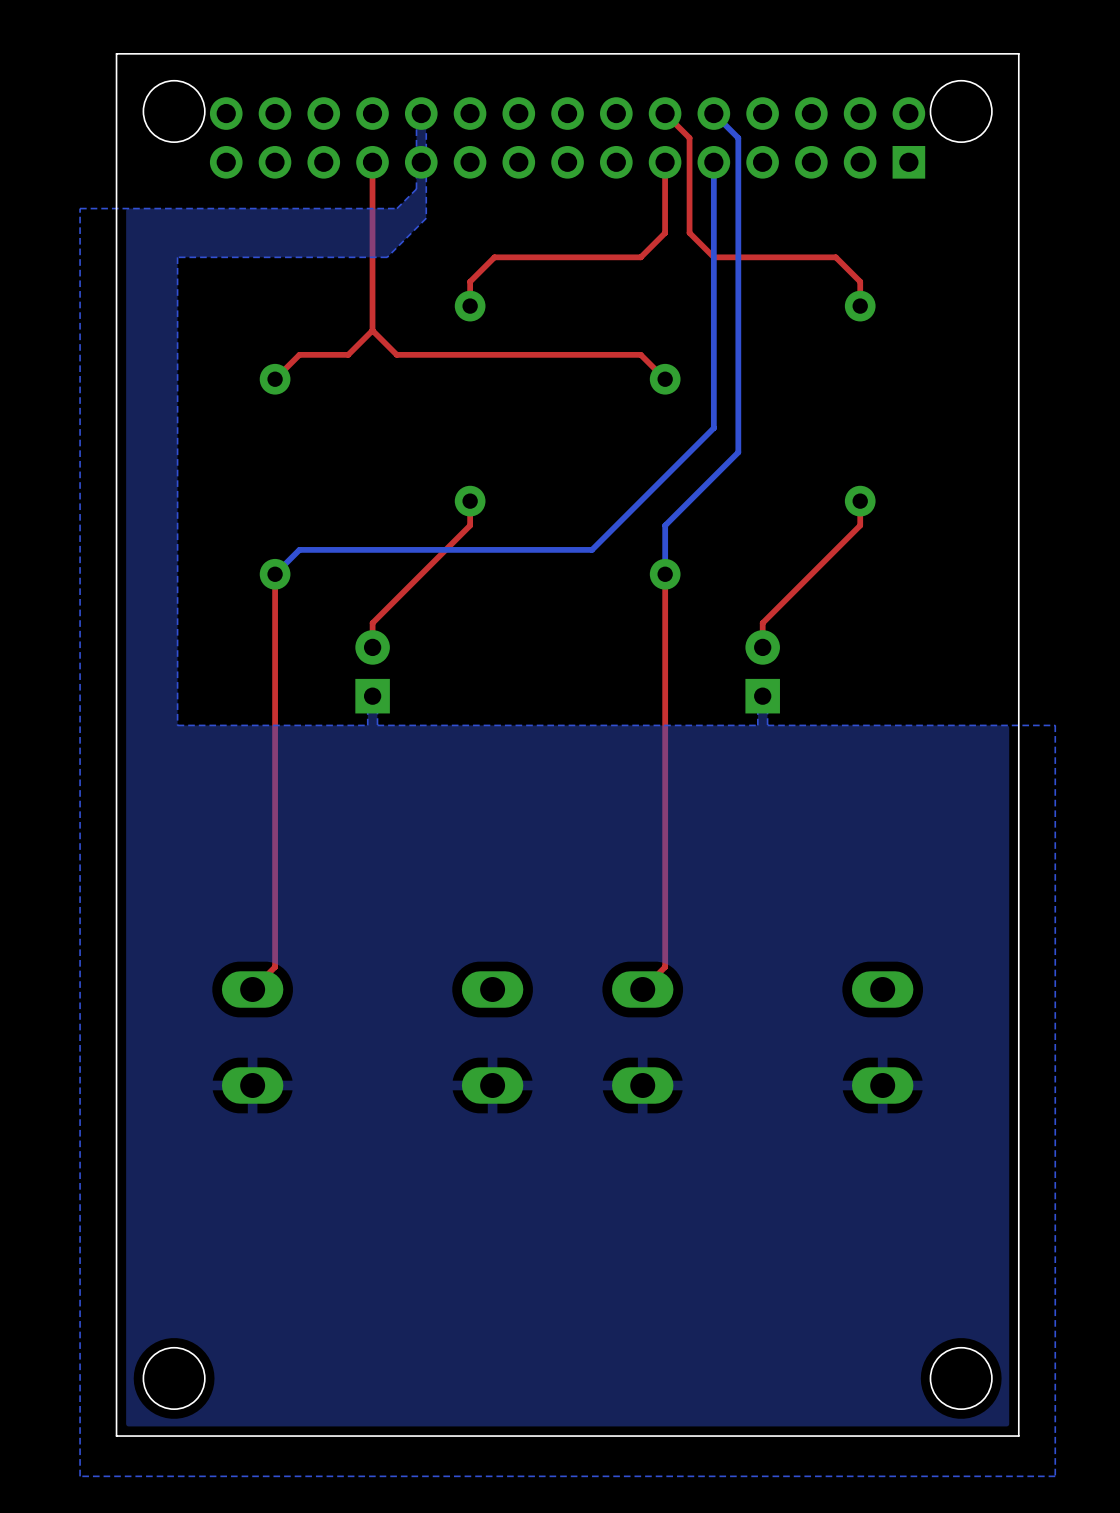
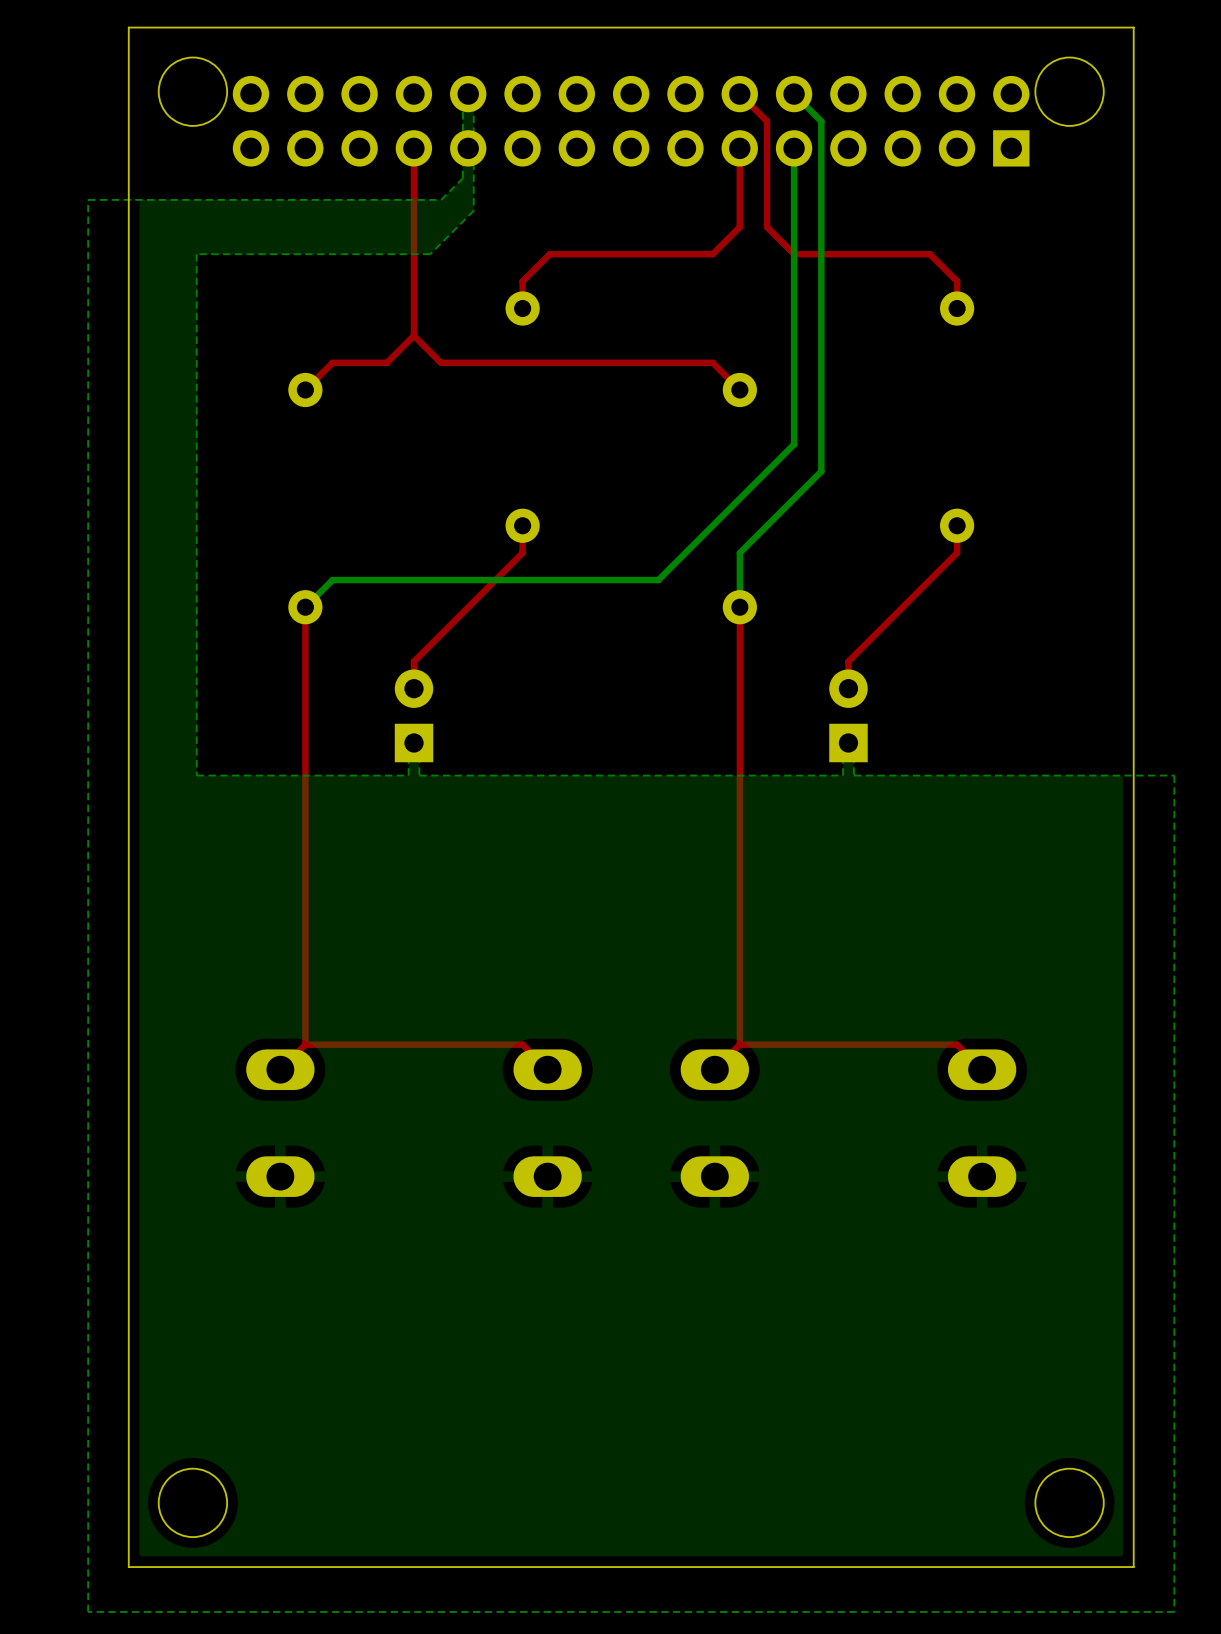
top track: none -> (305, 1044) (522, 1044) (547, 1069)
top track: none -> (739, 1044) (957, 1044) (982, 1069)

